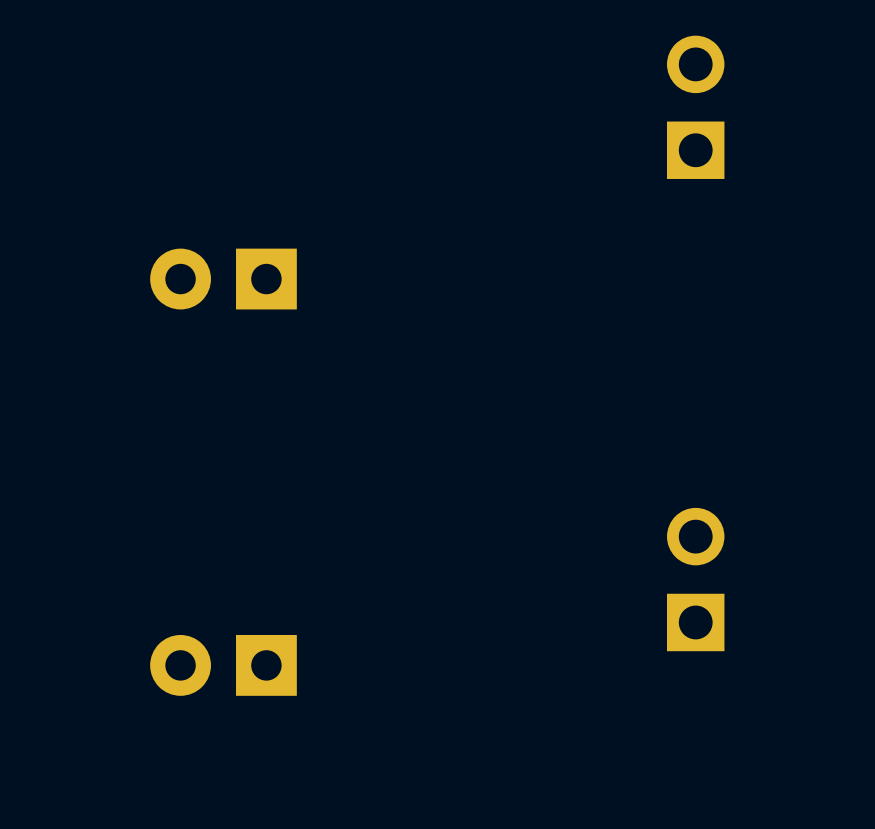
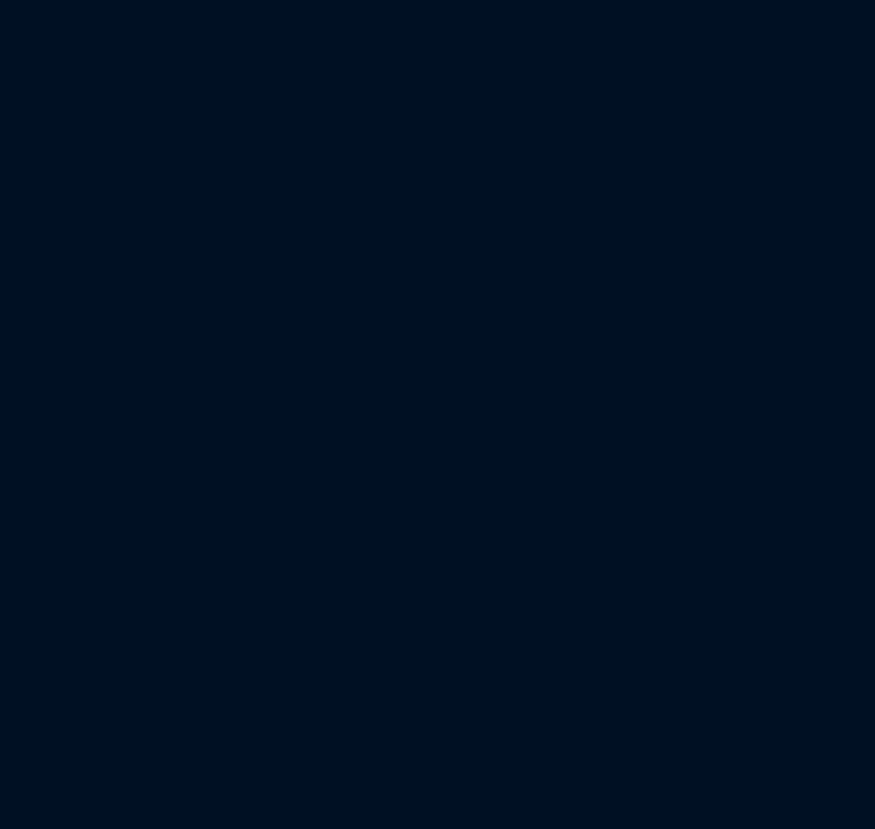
part: (695, 107) -> none
part: (223, 279) -> none
part: (695, 579) -> none
part: (223, 665) -> none

